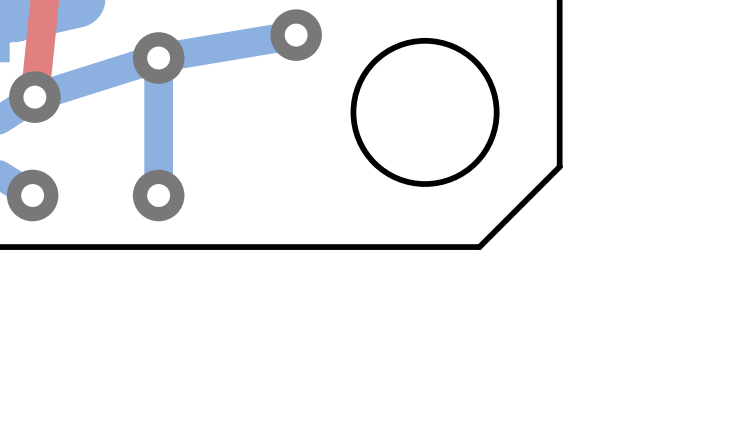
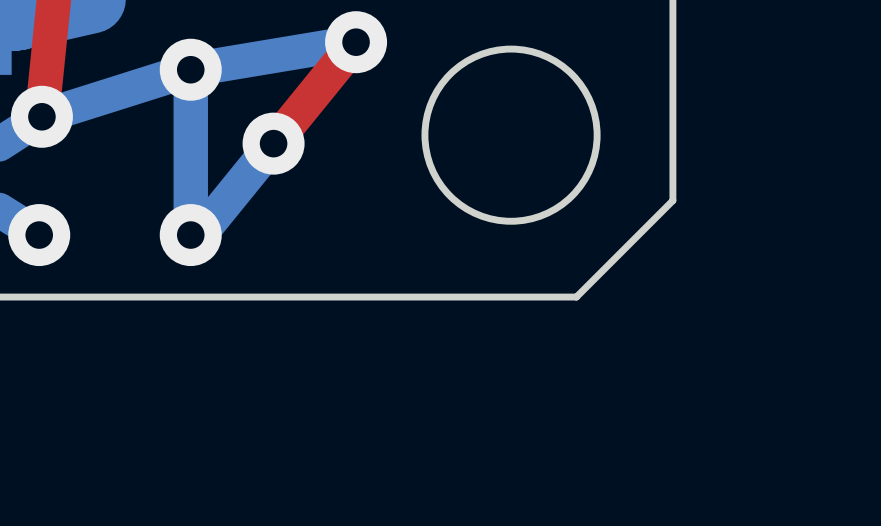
top track: none -> (356, 42) (273, 143)
bottom track: none -> (273, 143) (202, 231) (190, 235)
via: none -> (273, 143)

